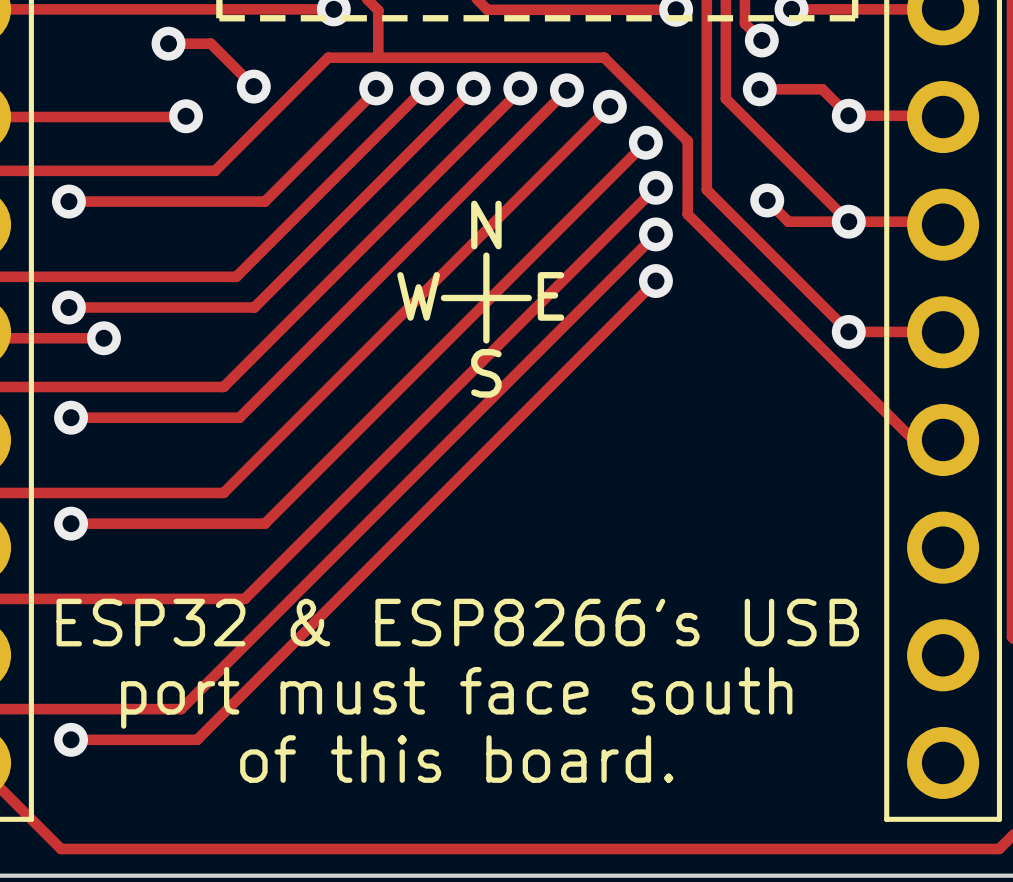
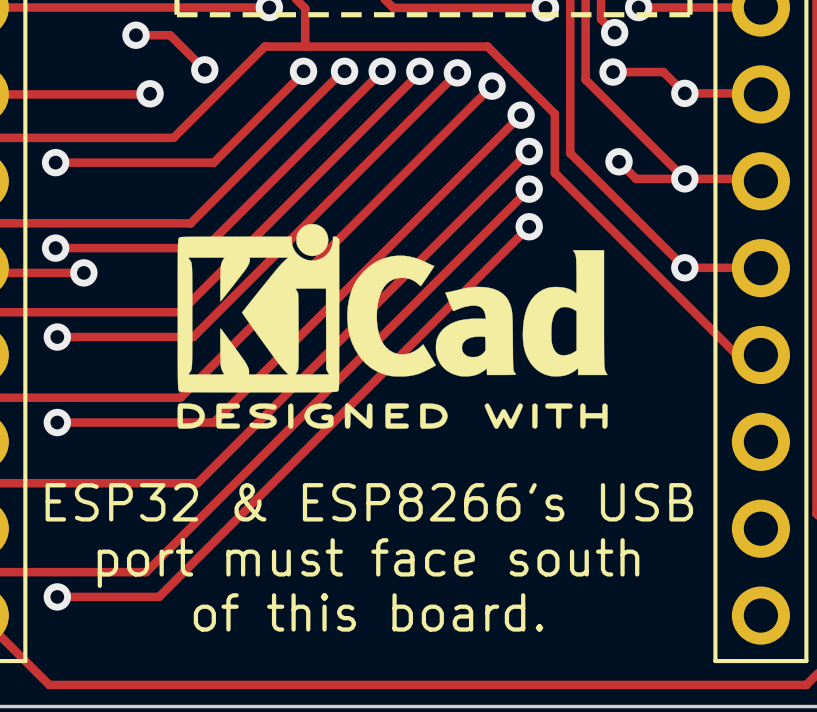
text: N (486, 224) -> none
line: (486, 255) (486, 340) -> none
drawing: none -> [177, 223, 608, 429]
text: W (418, 296) -> none
text: E (550, 296) -> none
line: (444, 297) (528, 297) -> none
text: S (486, 373) -> none

